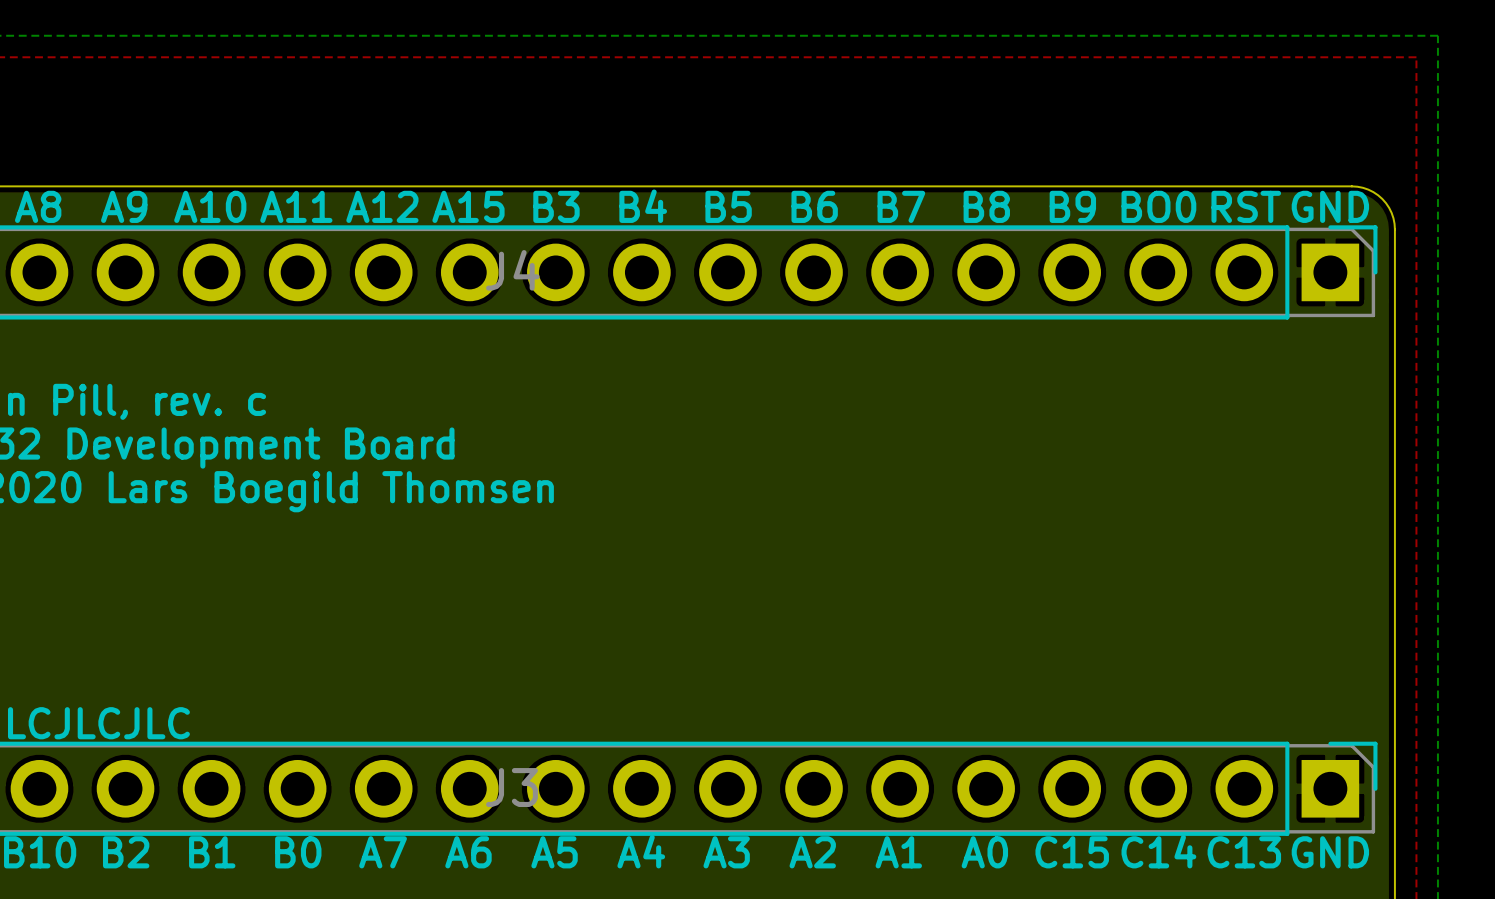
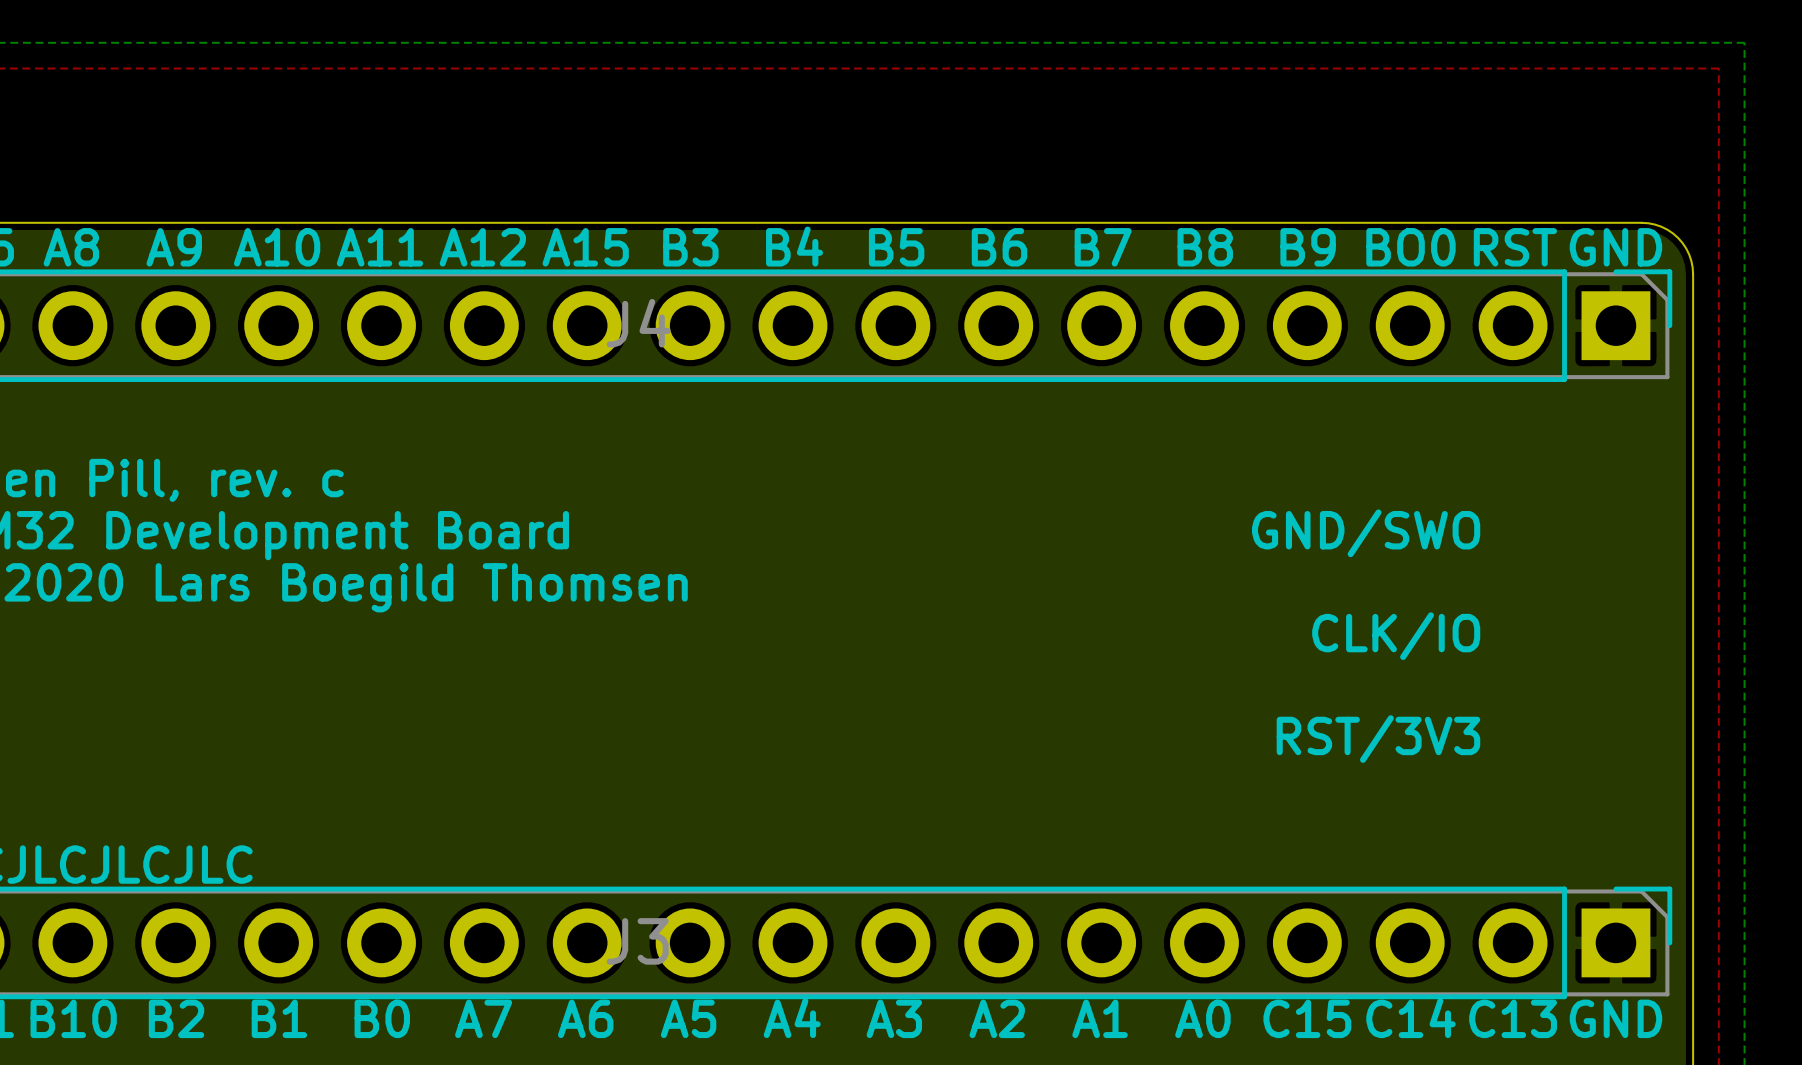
text: none -> GND/SWO (1366, 533)
text: none -> CLK/IO (1396, 636)
text: none -> RST/3V3 (1378, 739)

